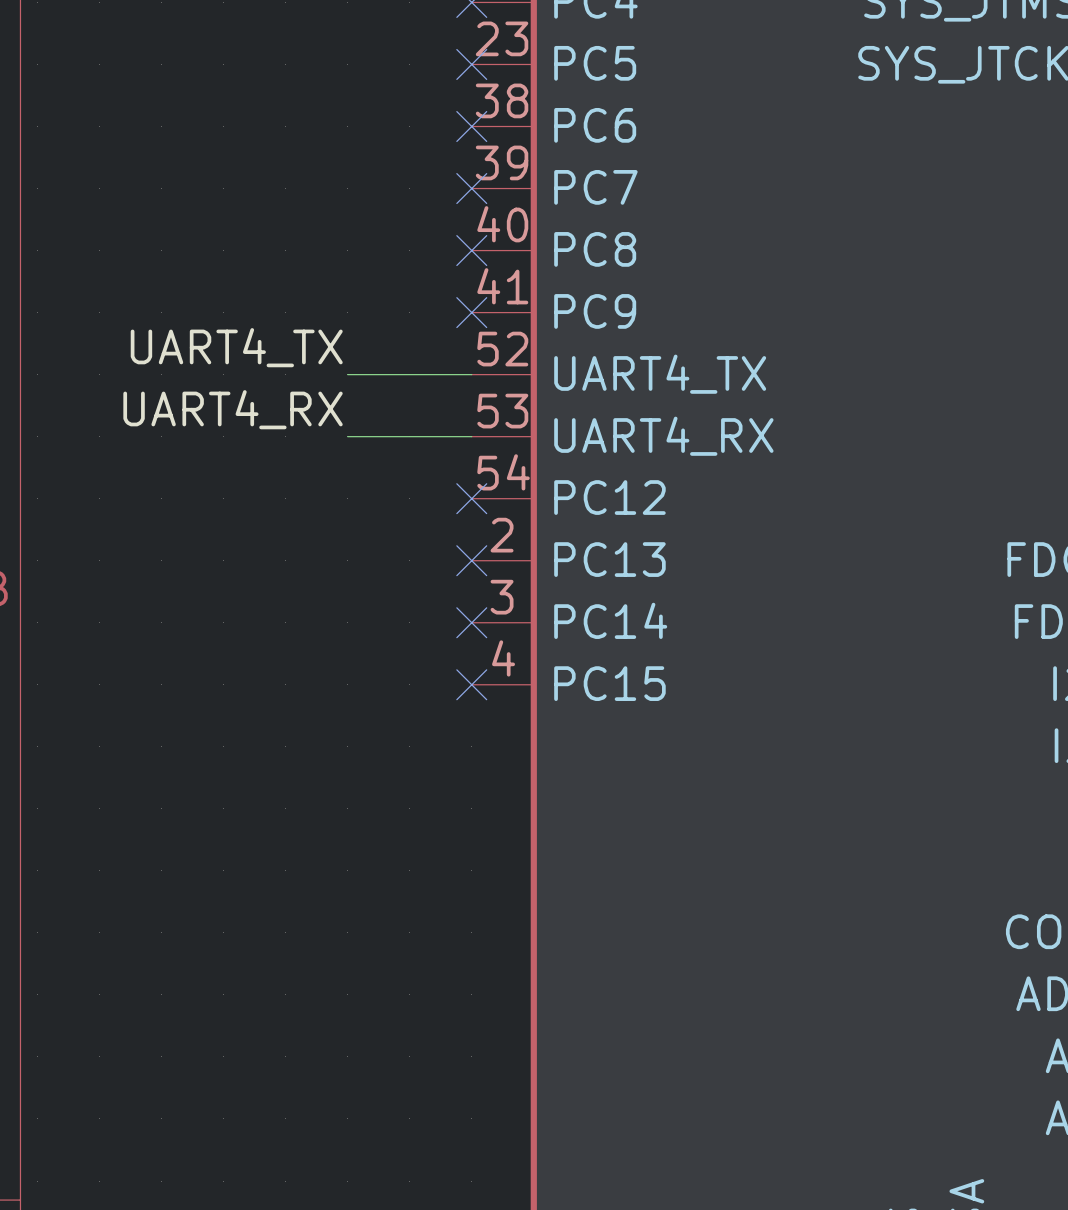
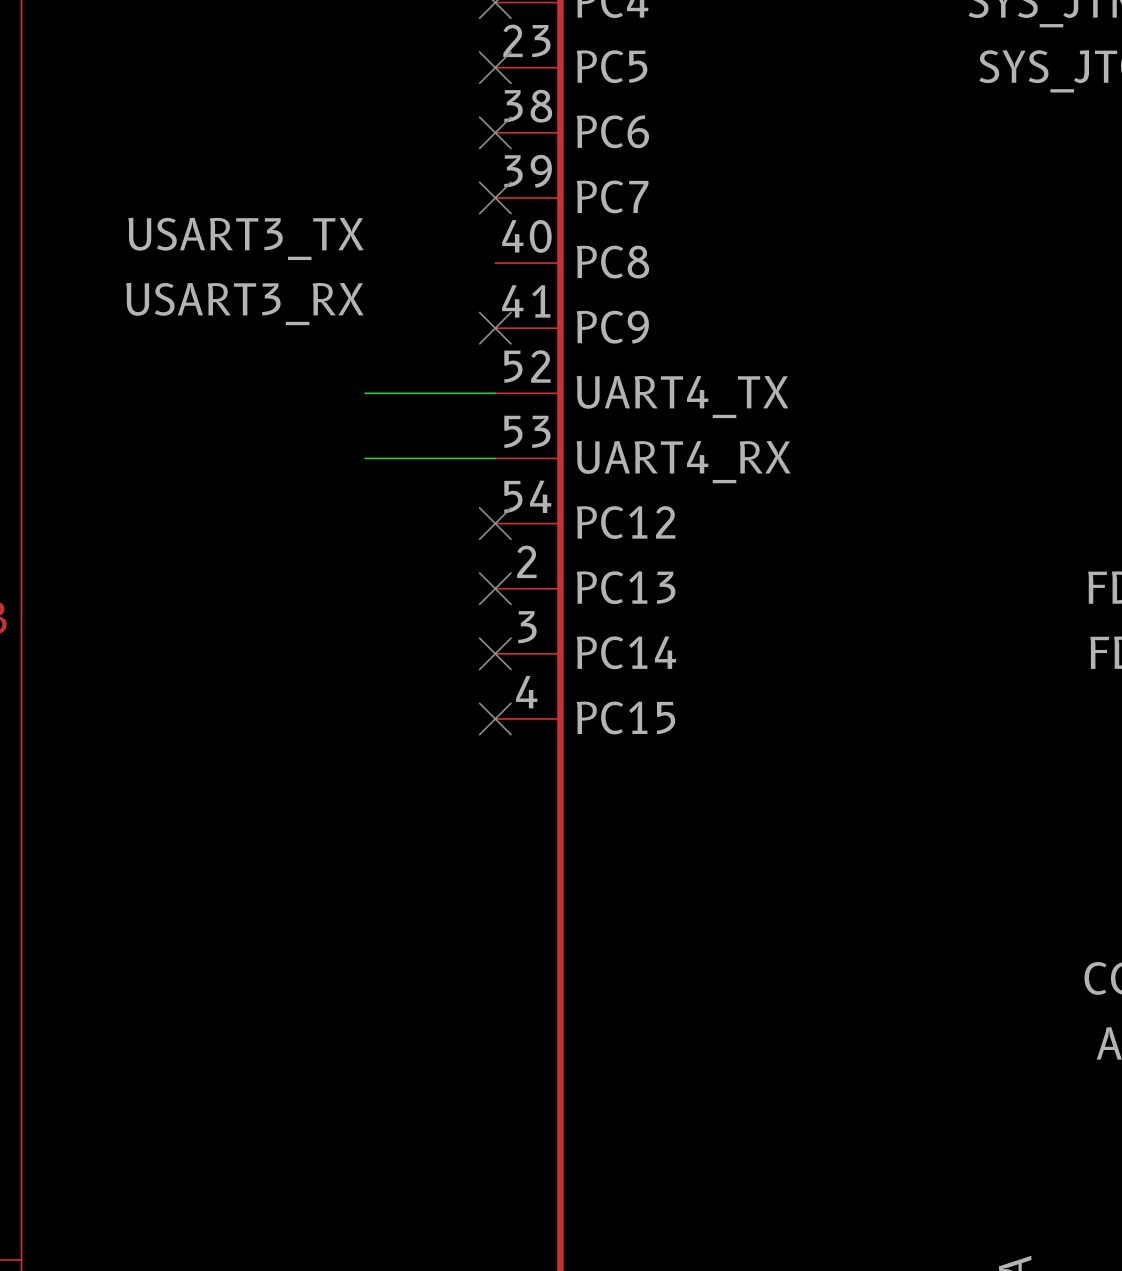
label: none -> USART3_TX (246, 238)
no-connect mark: (471, 250) -> none
label: UART4_TX (236, 347) -> USART3_RX (244, 304)
label: UART4_RX (233, 409) -> none

